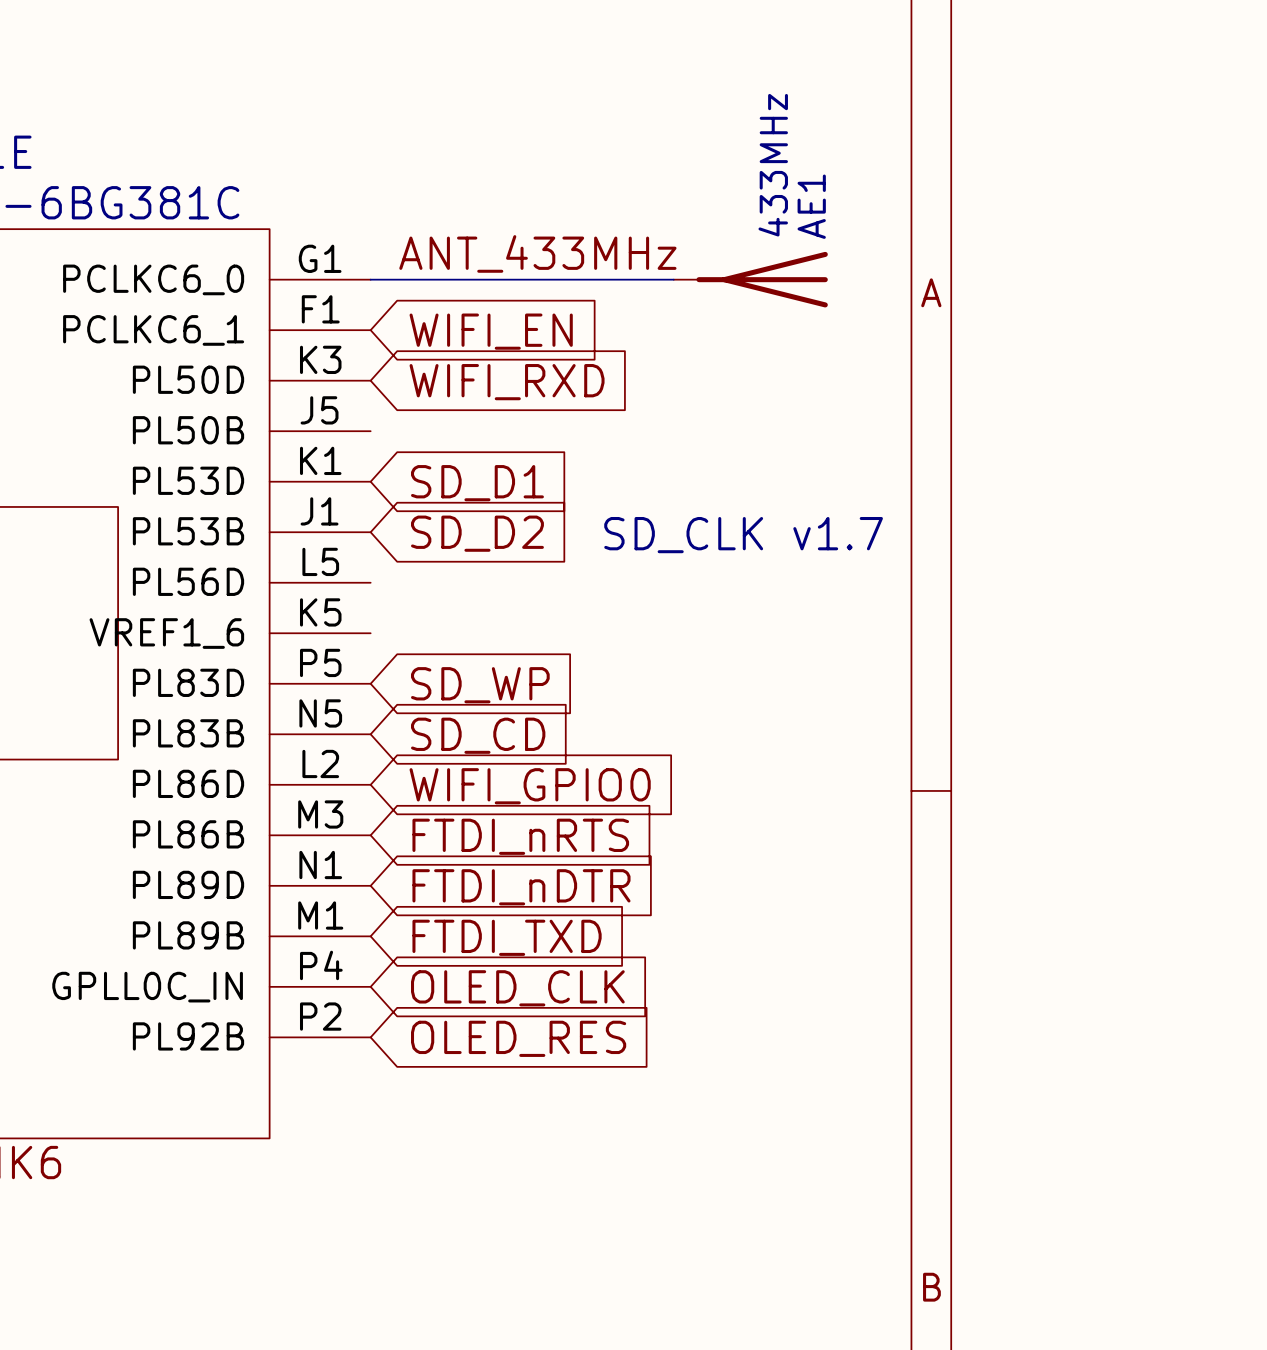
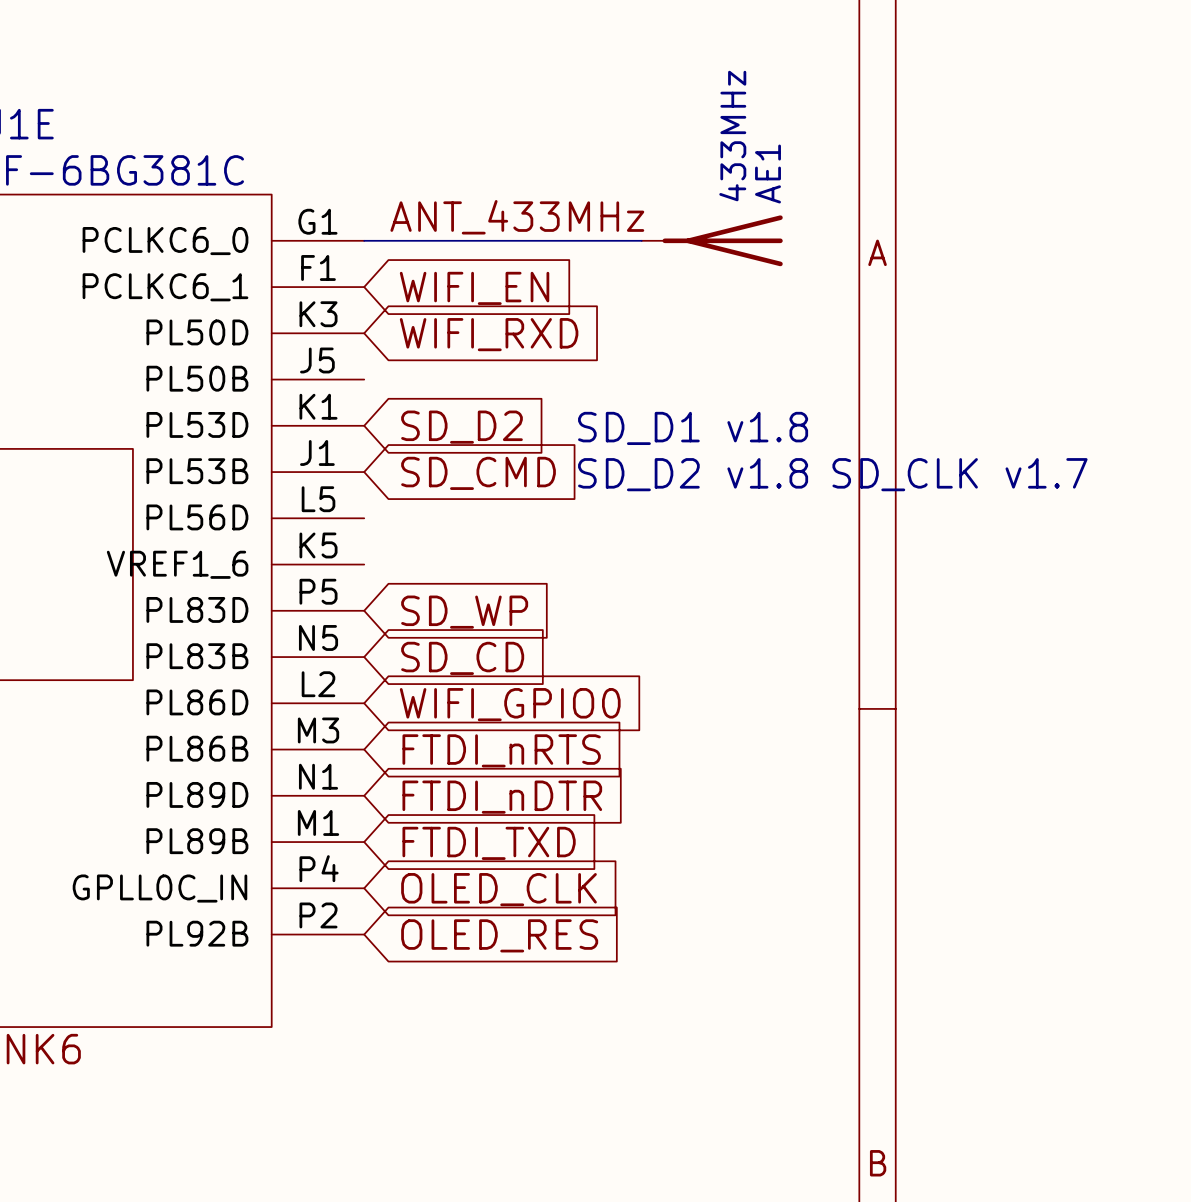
global label: SD_D1 (477, 483) -> SD_D2 (461, 427)
text: none -> SD_D1 v1.8 (693, 428)
global label: SD_D2 (477, 533) -> SD_CMD (478, 473)
text: SD_CLK v1.7 (743, 535) -> SD_D2 v1.8 (693, 474)
text: none -> SD_CLK v1.7 (959, 474)

